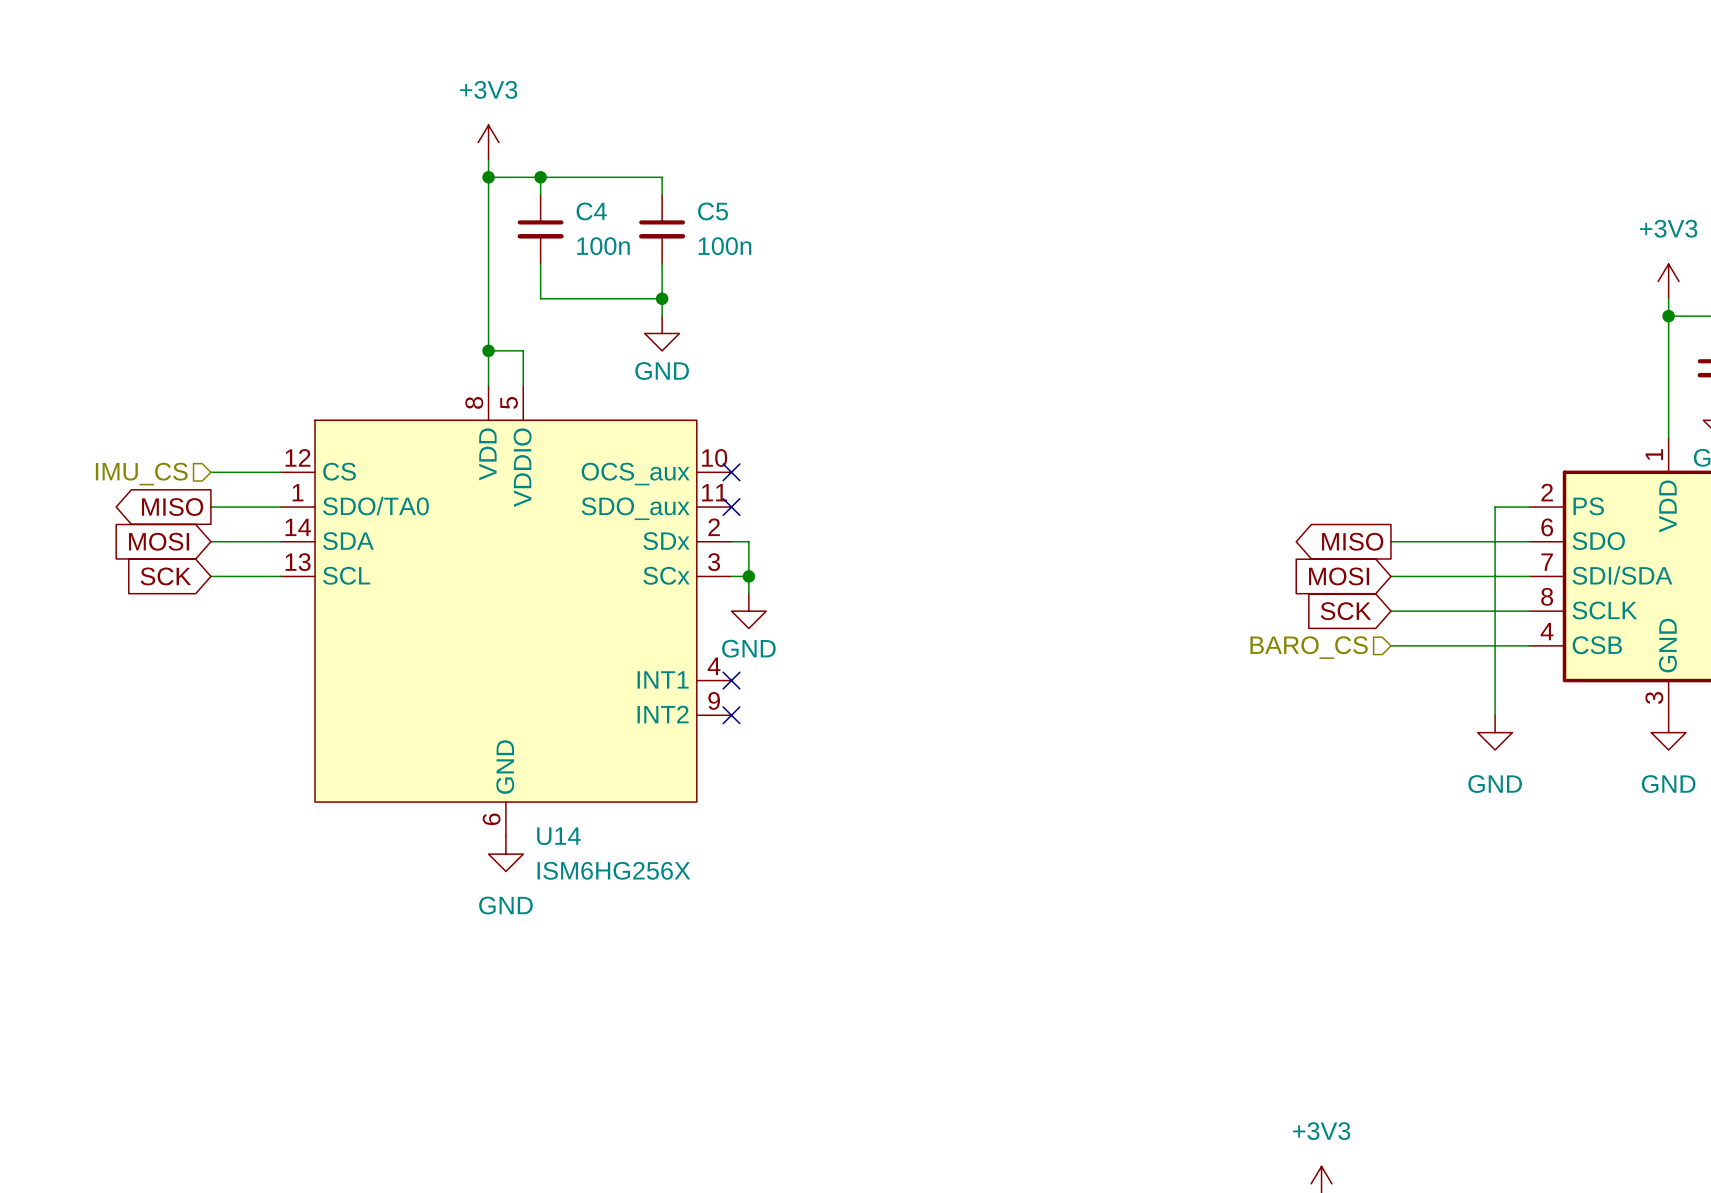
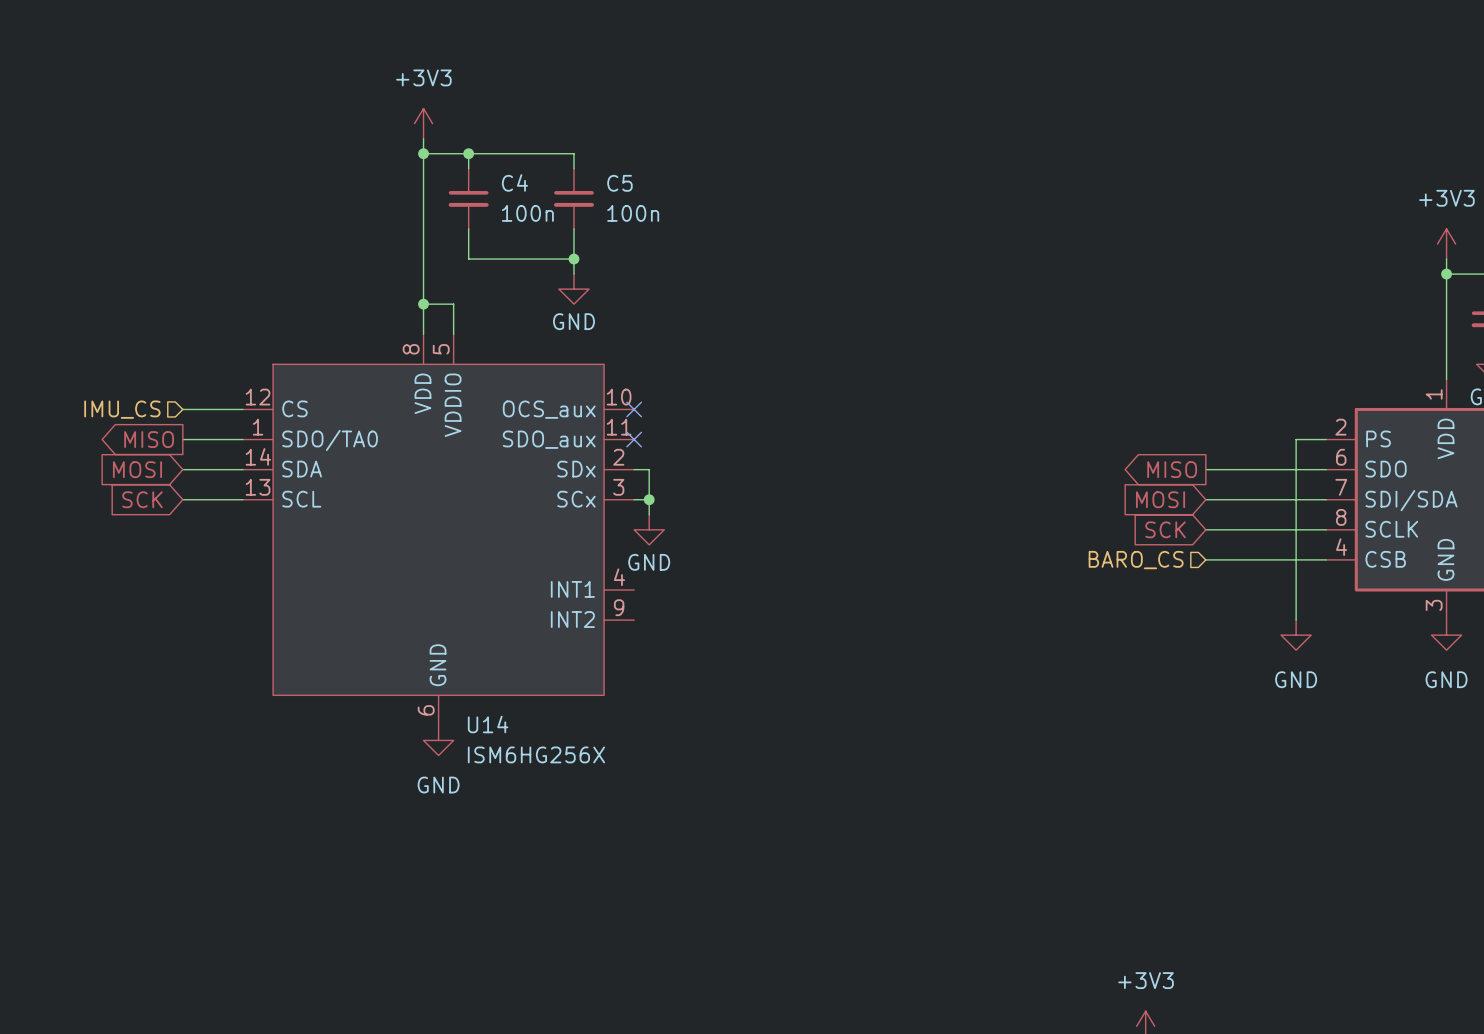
no-connect mark: (731, 680) -> none
no-connect mark: (731, 715) -> none

